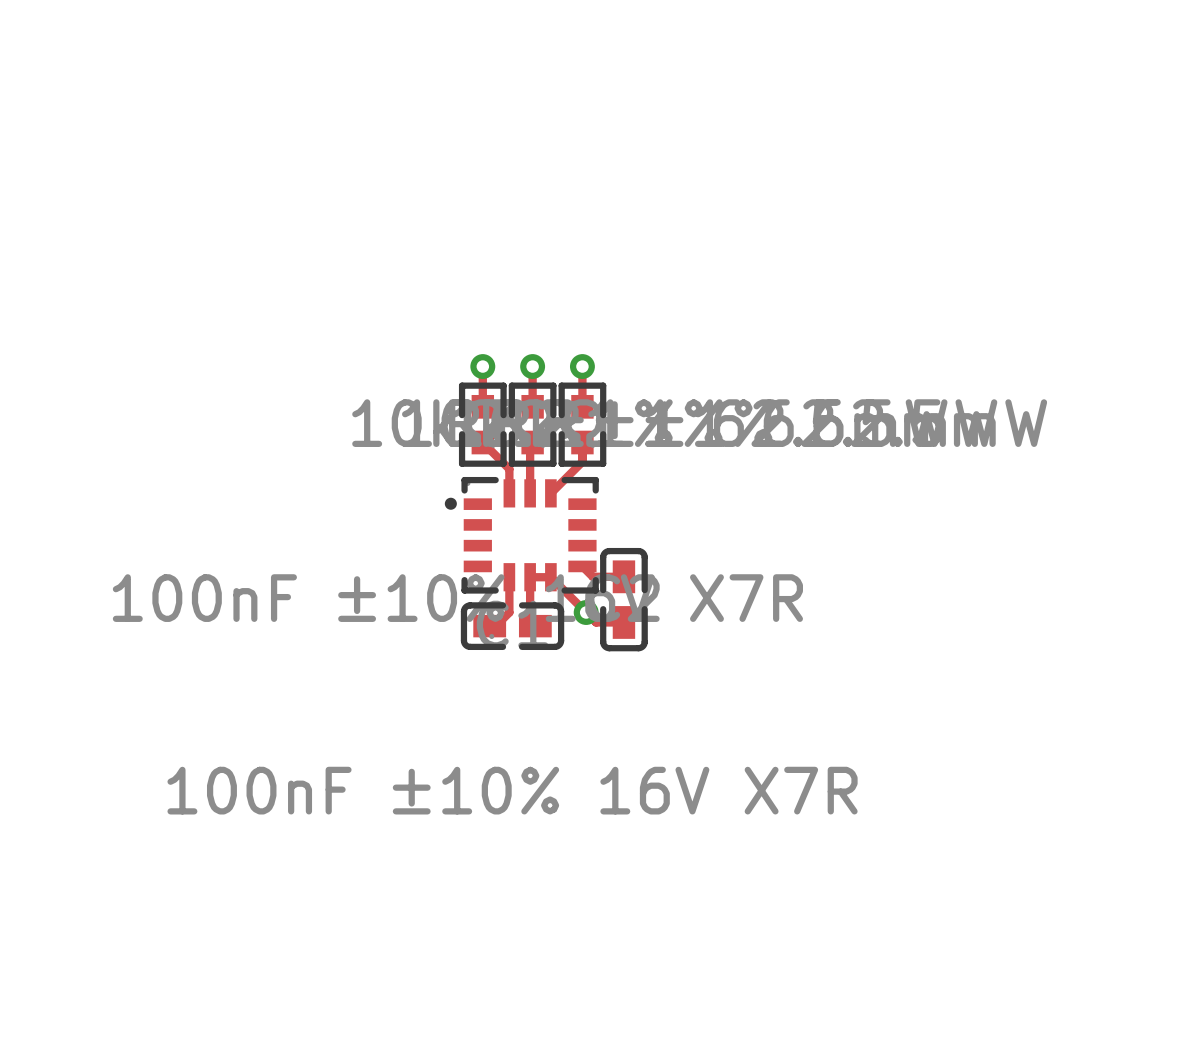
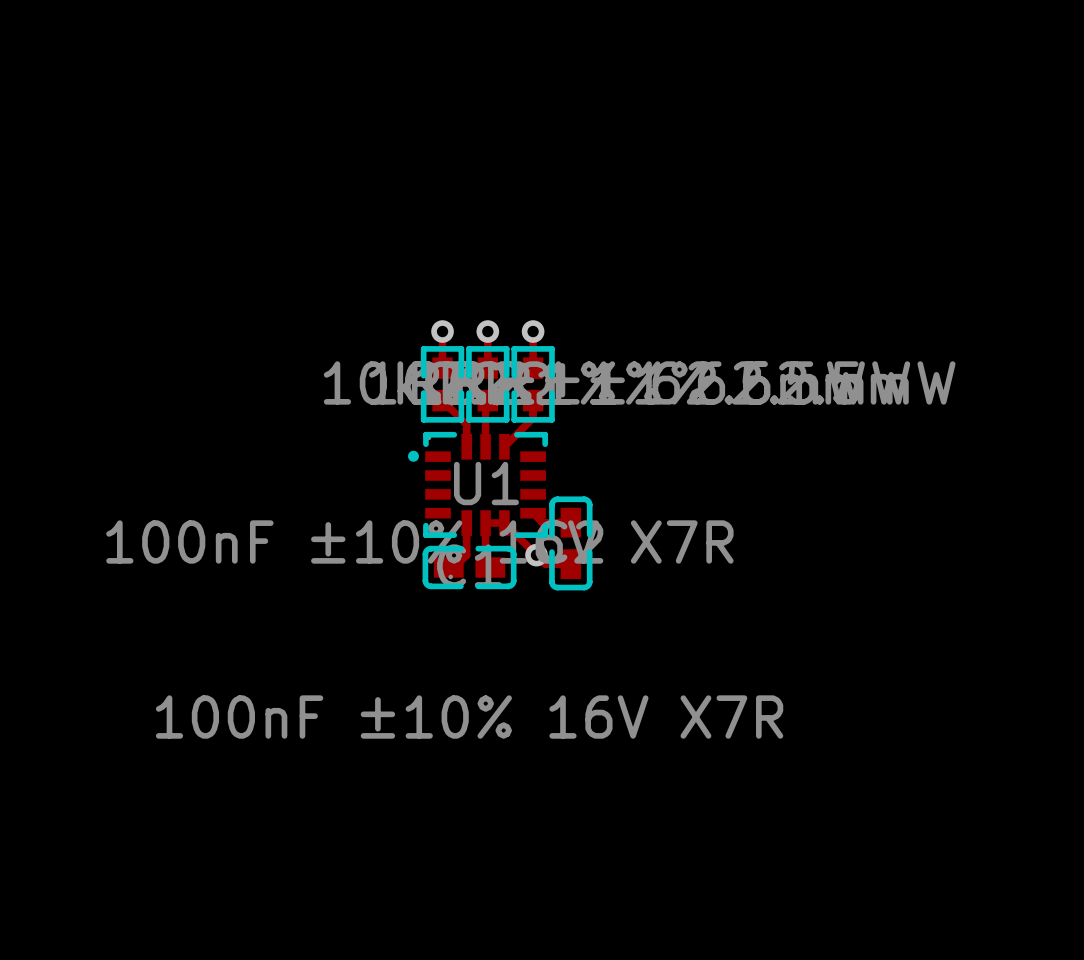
U1 name: none -> U1 (486, 483)

